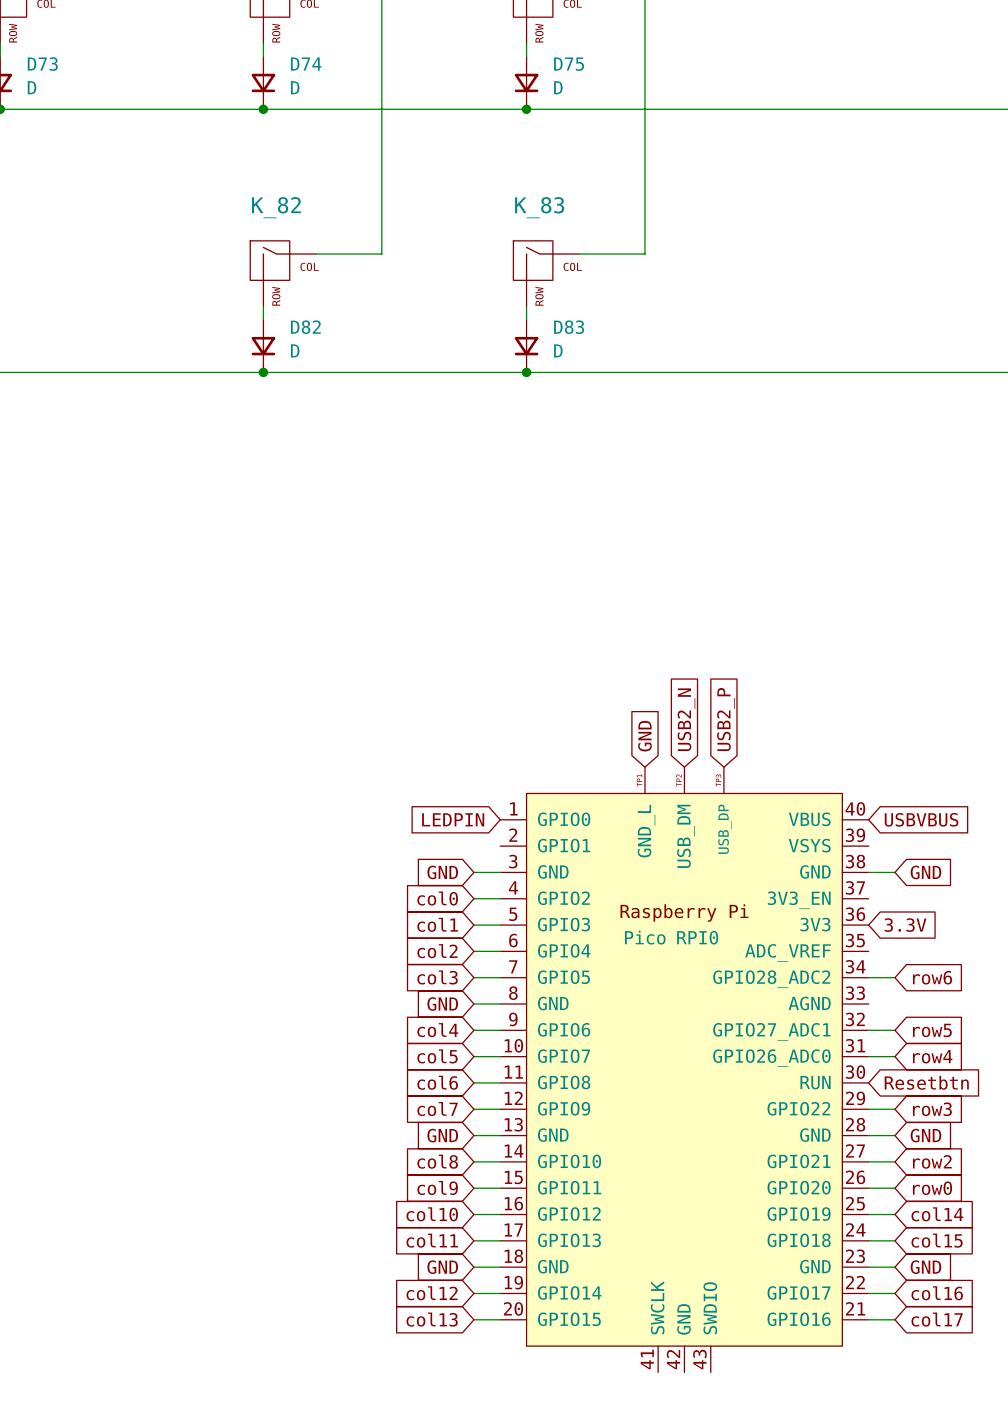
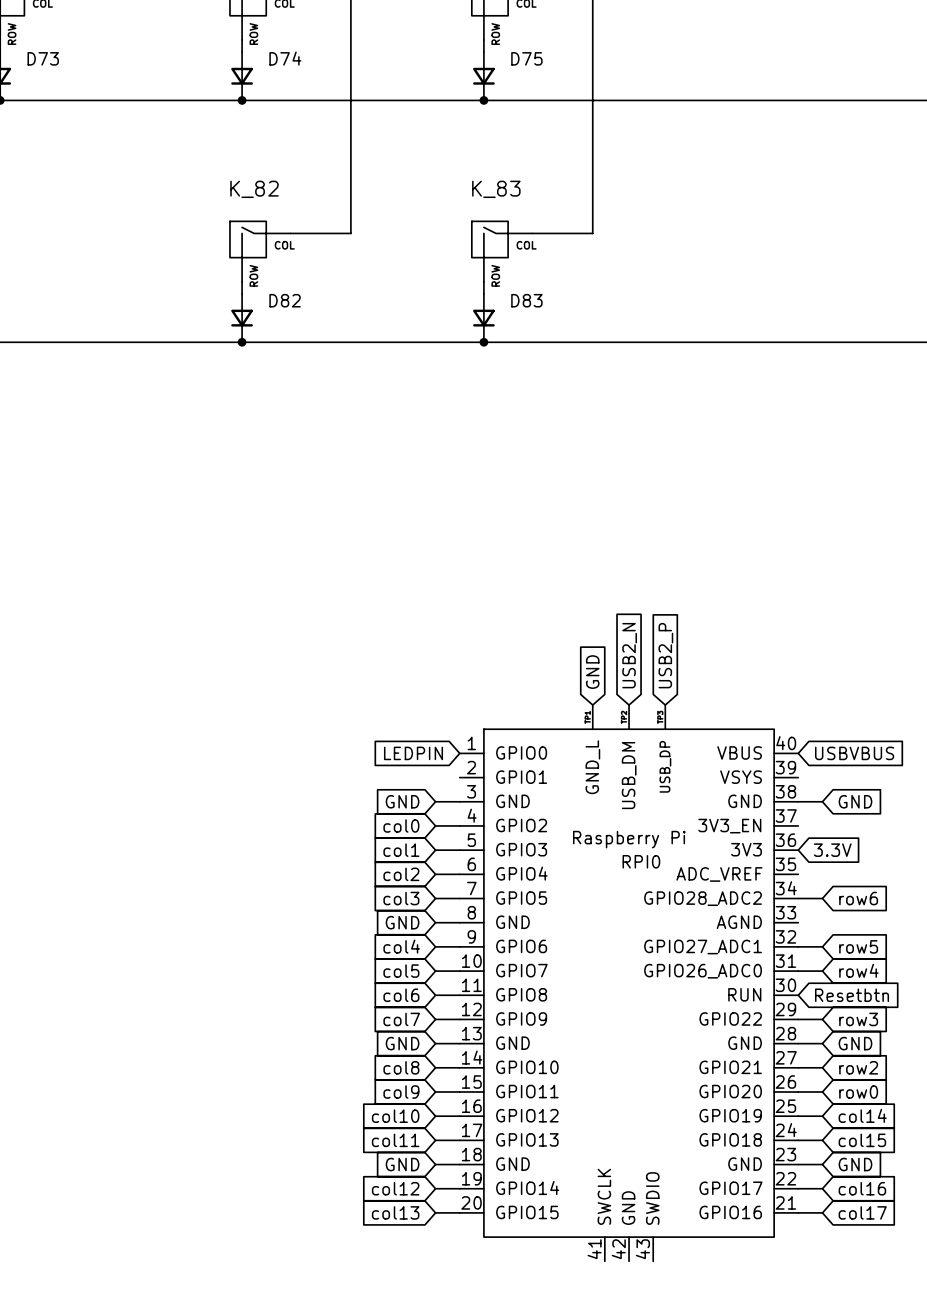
D73 value: D (32, 87) -> none
D74 value: D (295, 87) -> none
D75 value: D (558, 87) -> none
D82 value: D (295, 350) -> none
D83 value: D (558, 350) -> none
RPI0 value: Pico (645, 937) -> none

